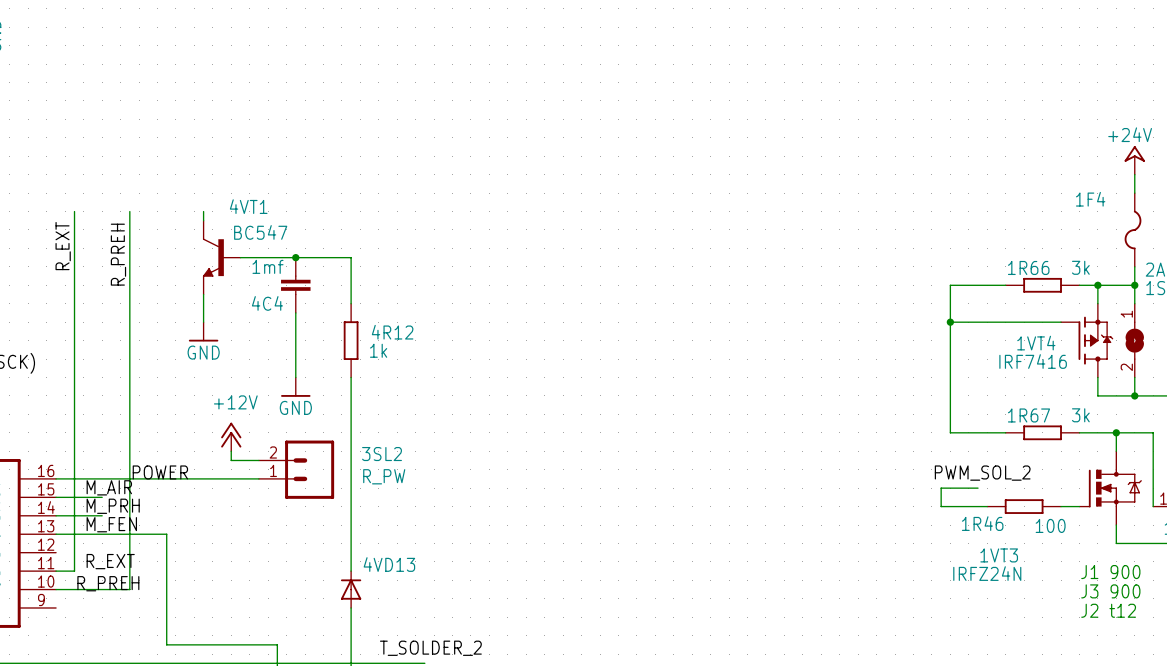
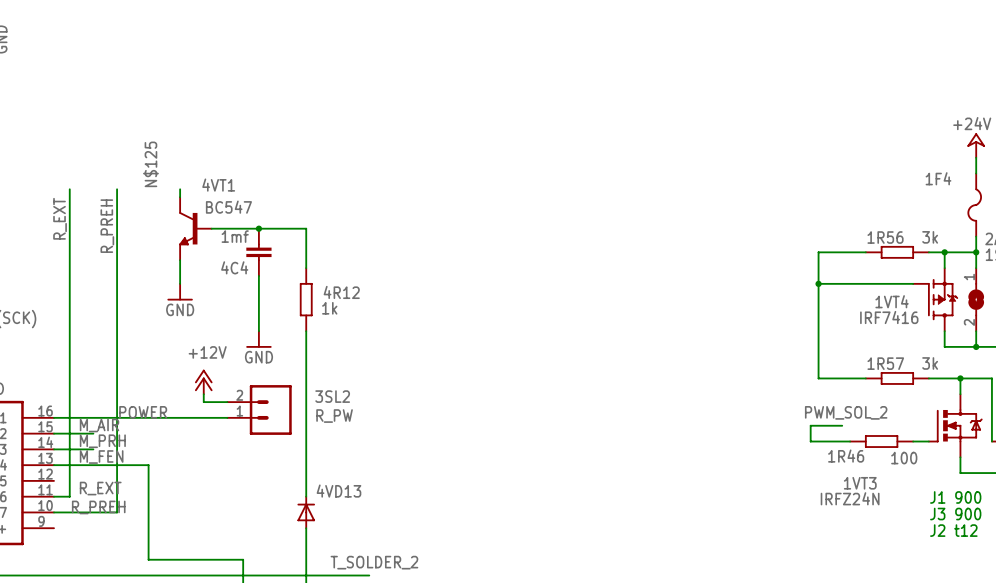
label: none -> N$125 (150, 164)
1R66 name: 1R66 (1028, 267) -> 1R56 (885, 237)
1R67 name: 1R67 (1028, 415) -> 1R57 (885, 363)

